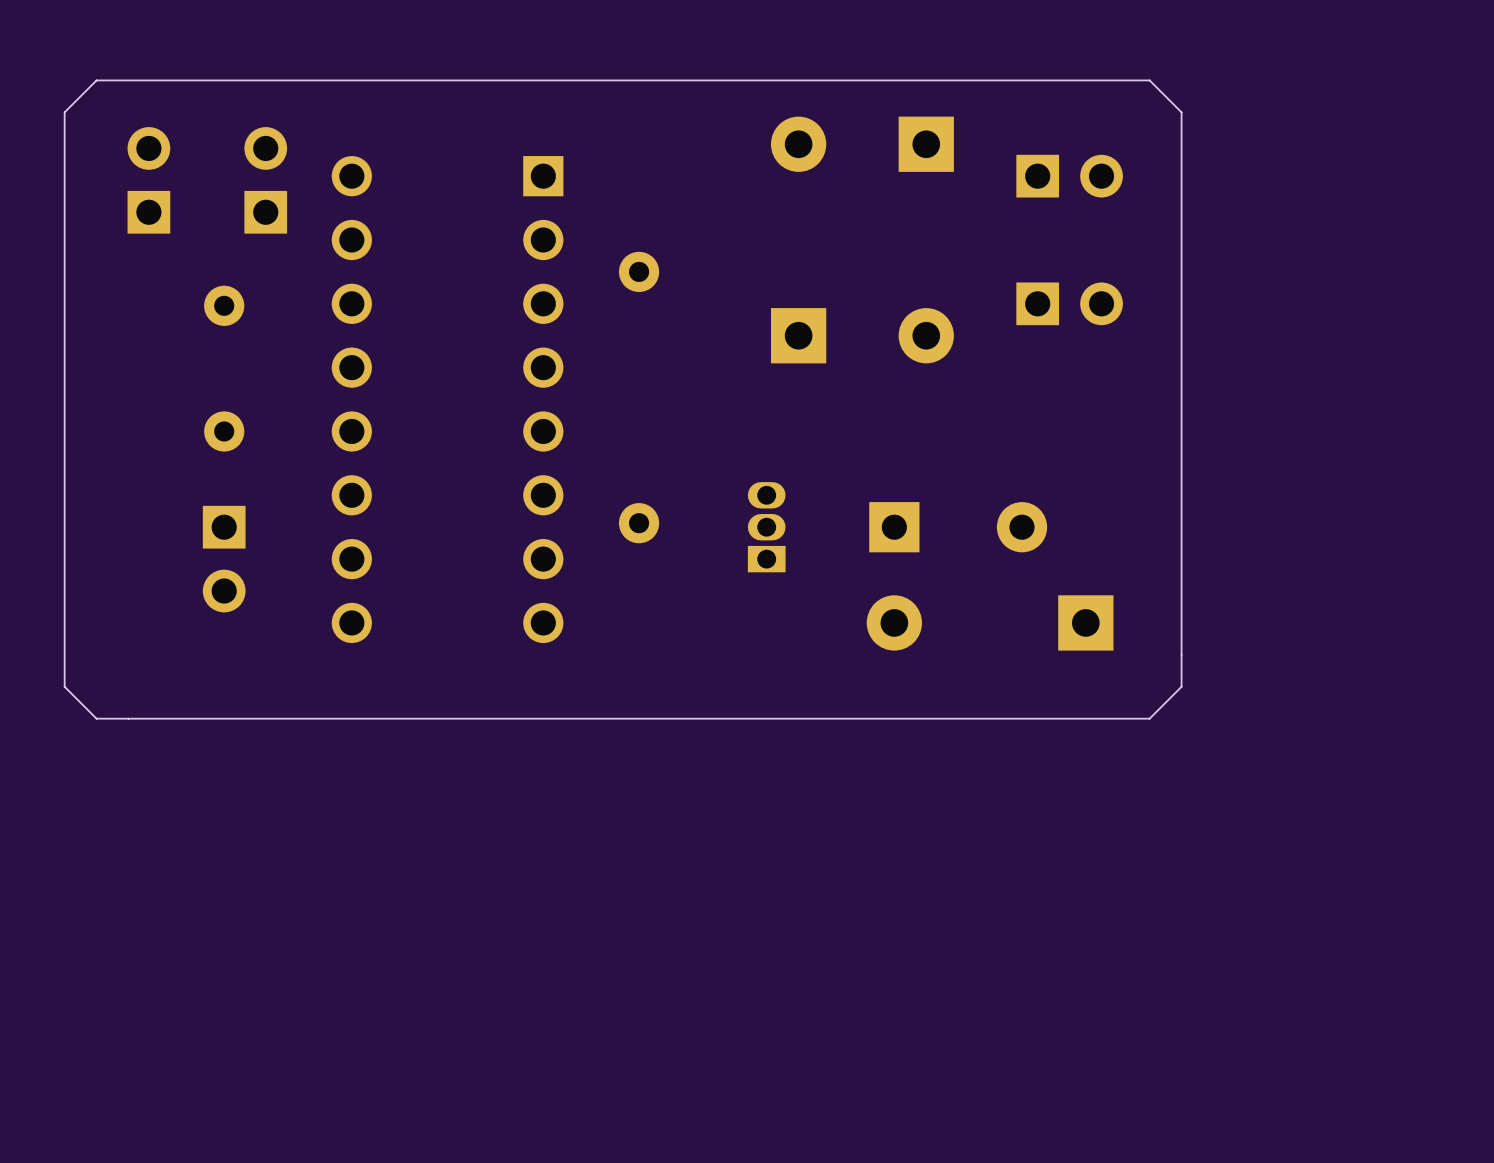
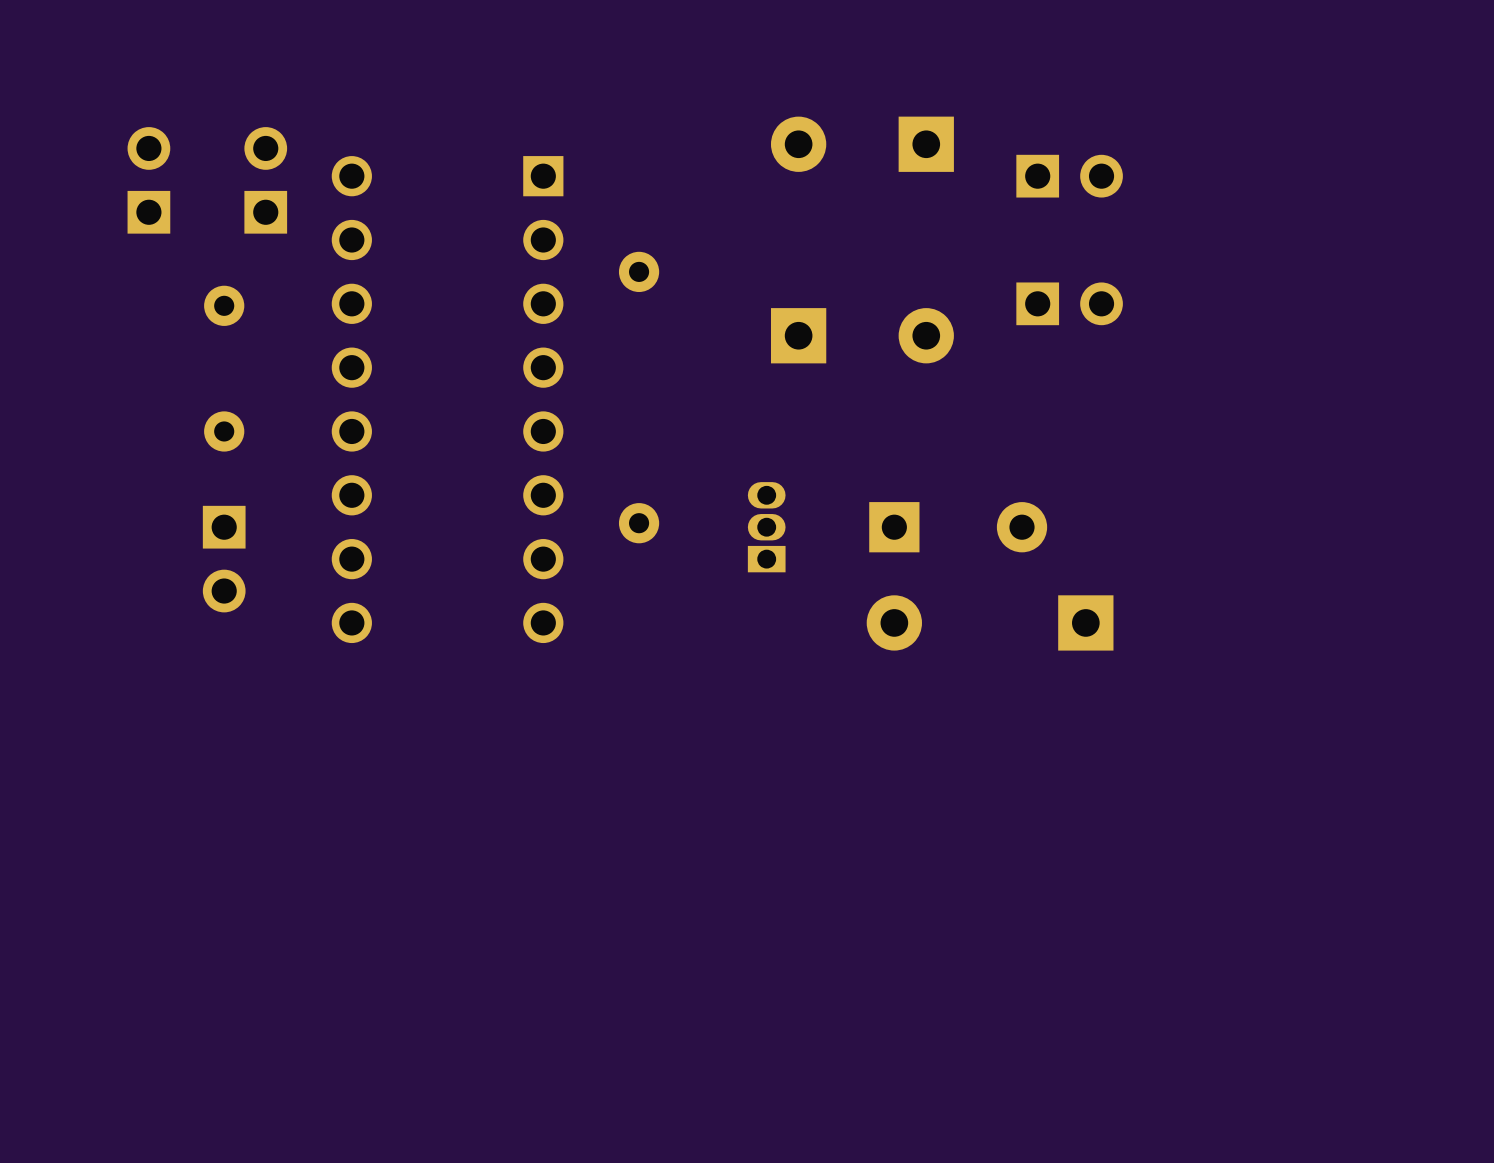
board edge: (1149, 80) (96, 80) (64, 112) (64, 686) (96, 718) (1149, 718) (1181, 686) (1181, 112) (1149, 80) -> none

